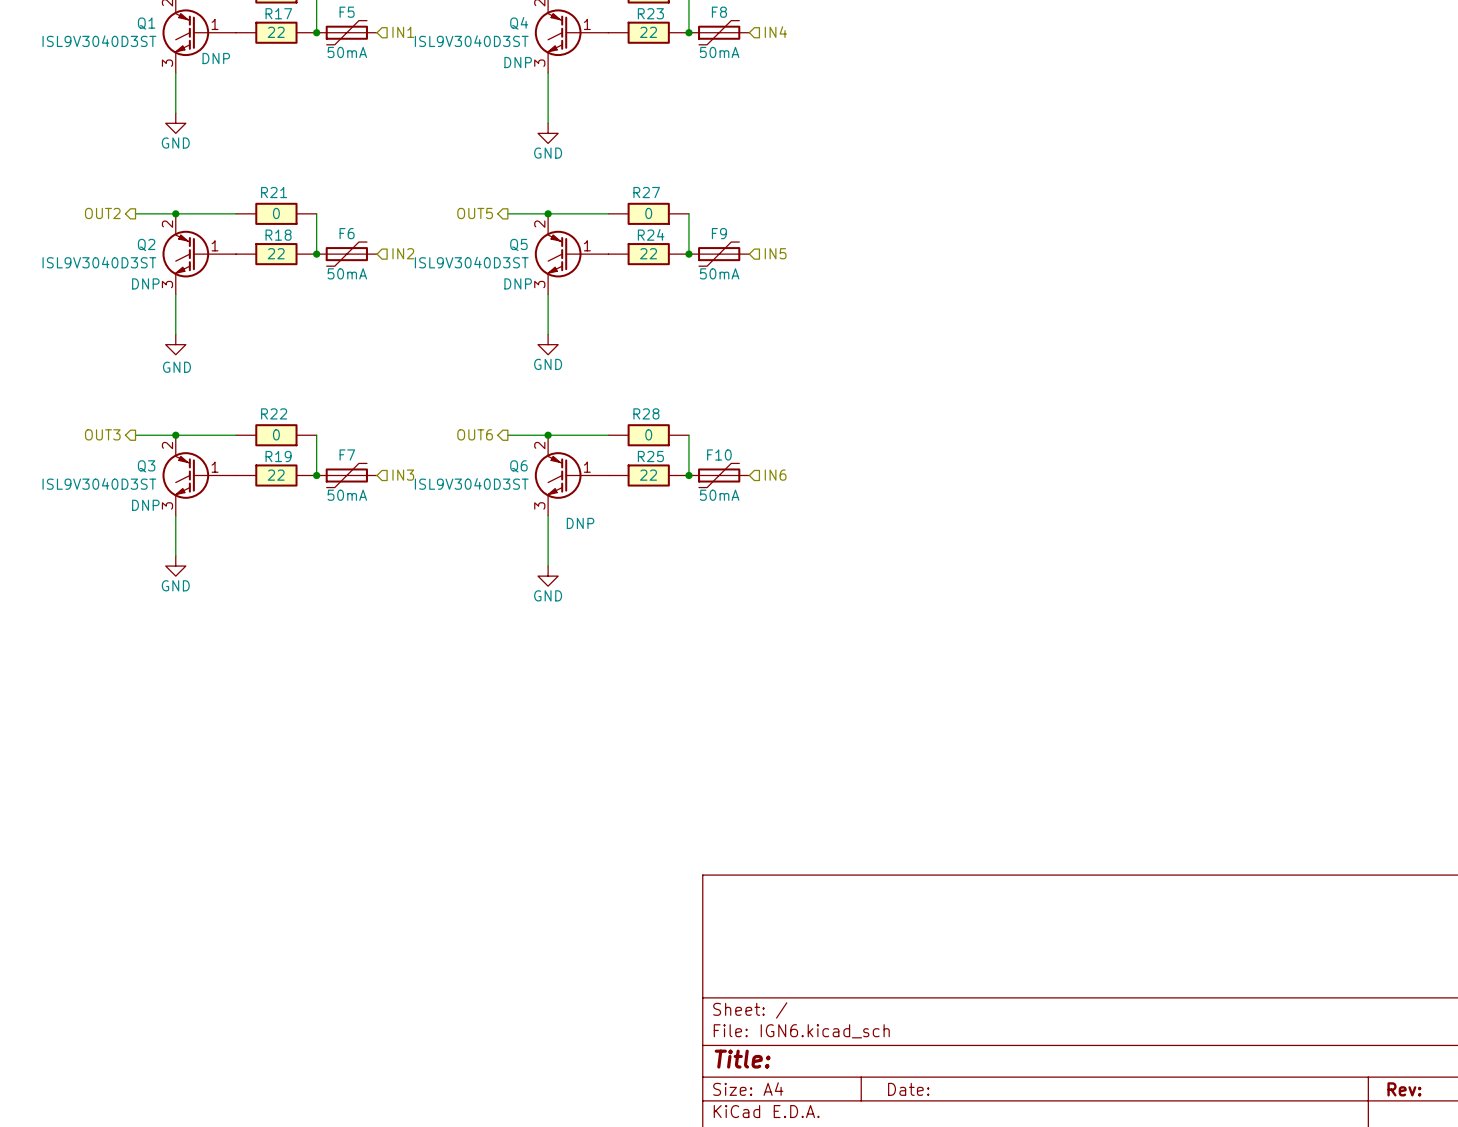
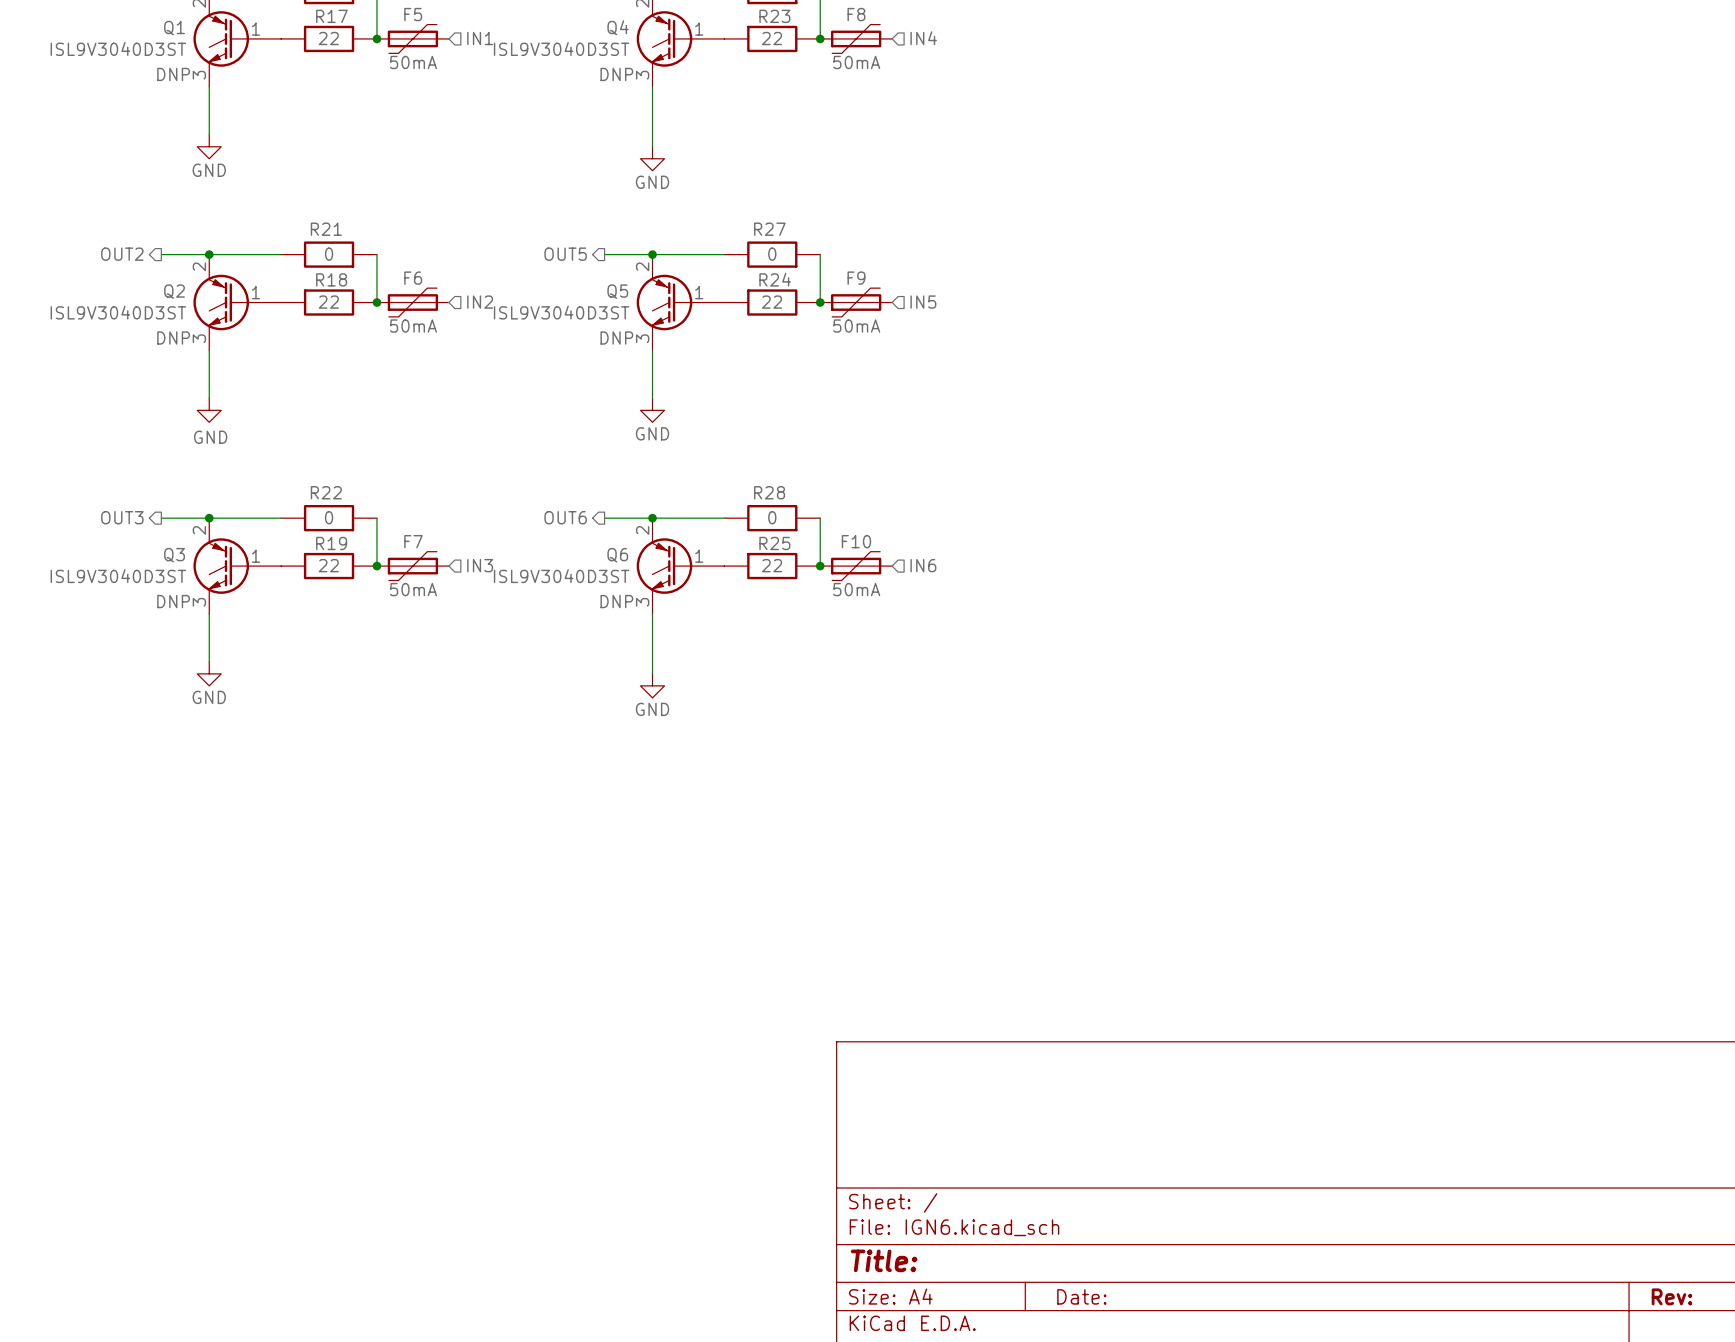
Q1 text position: DNP (216, 58) -> DNP (173, 74)
Q6 text position: DNP (580, 523) -> DNP (616, 601)

